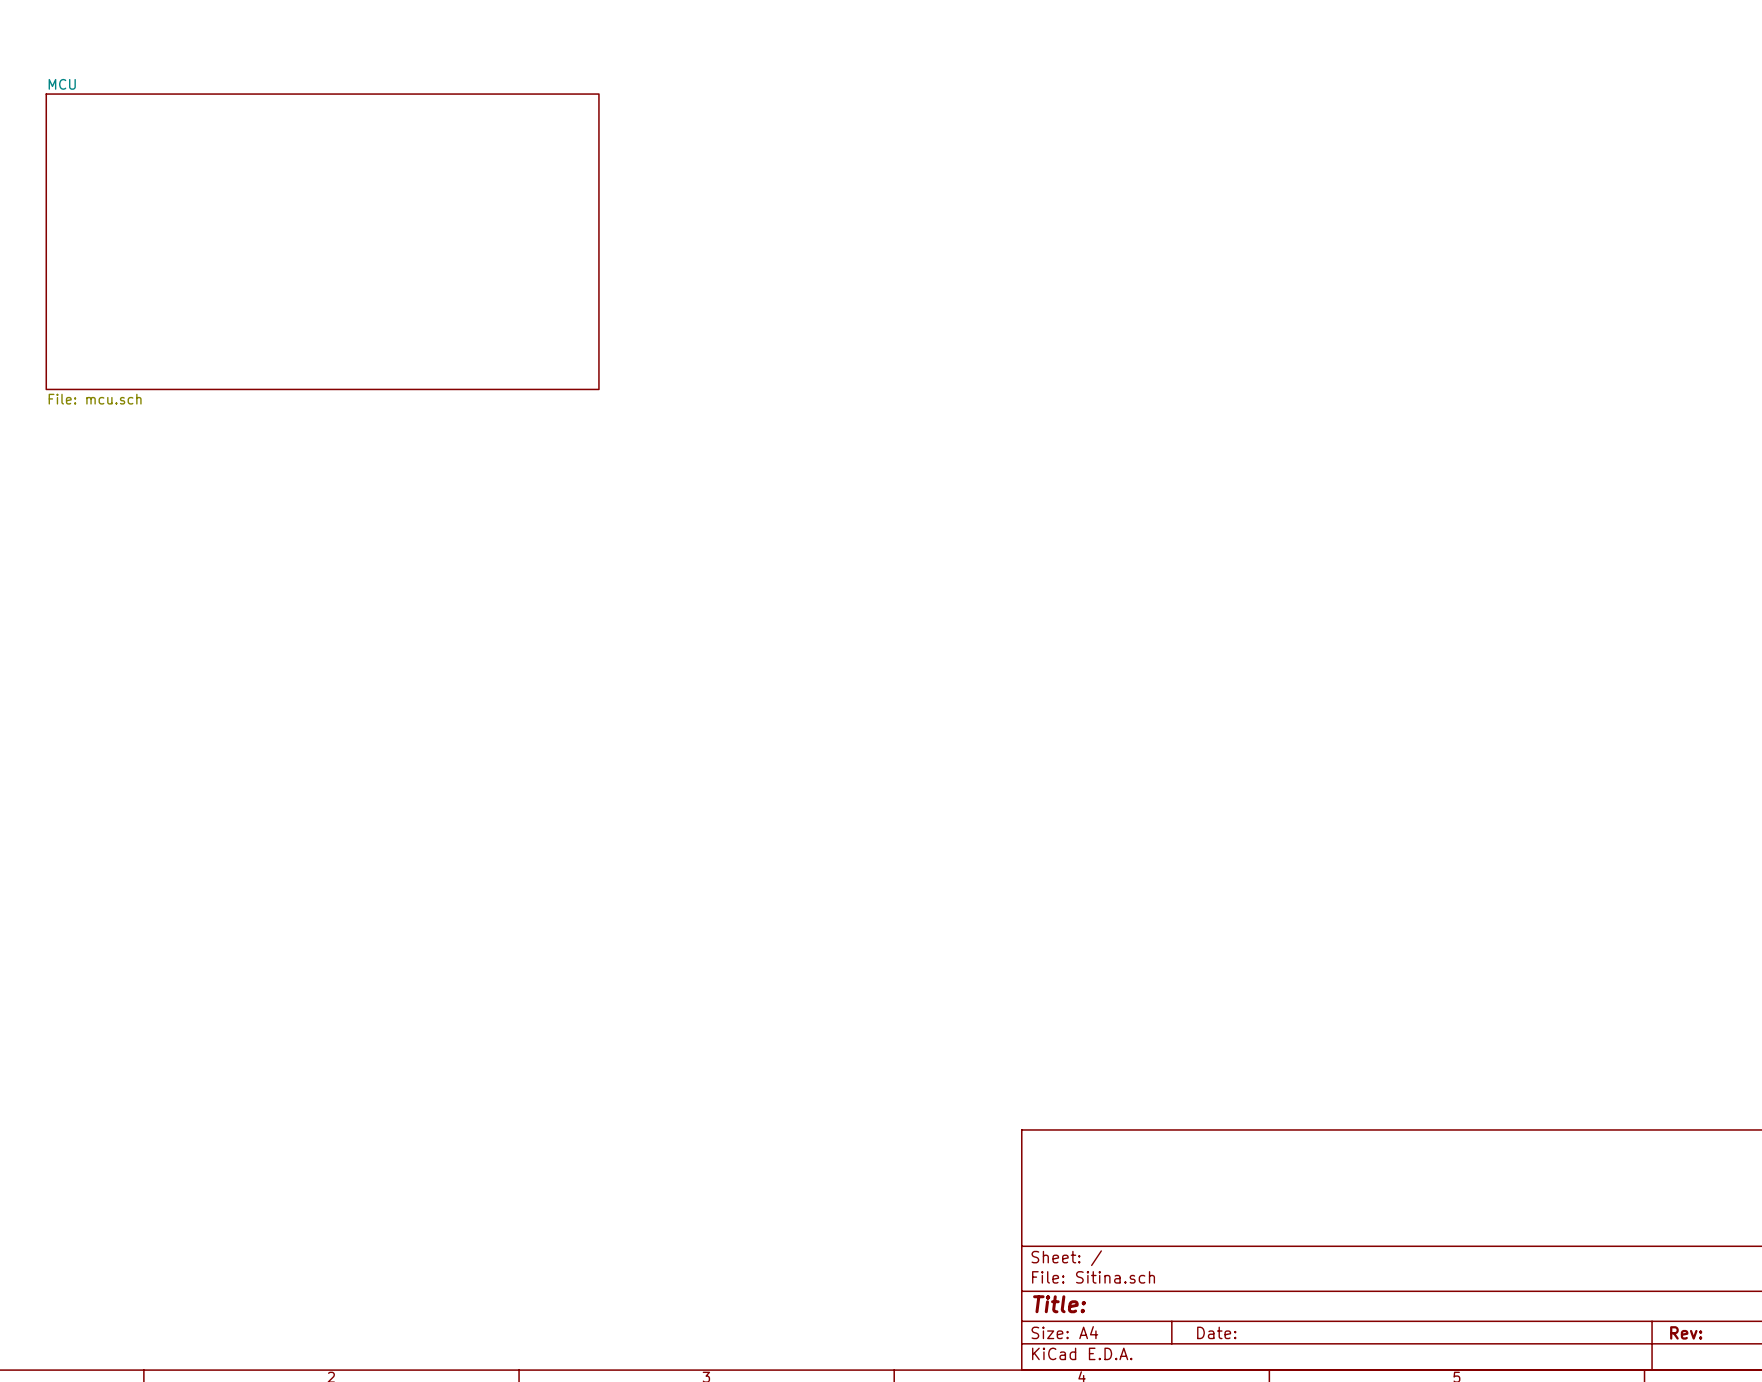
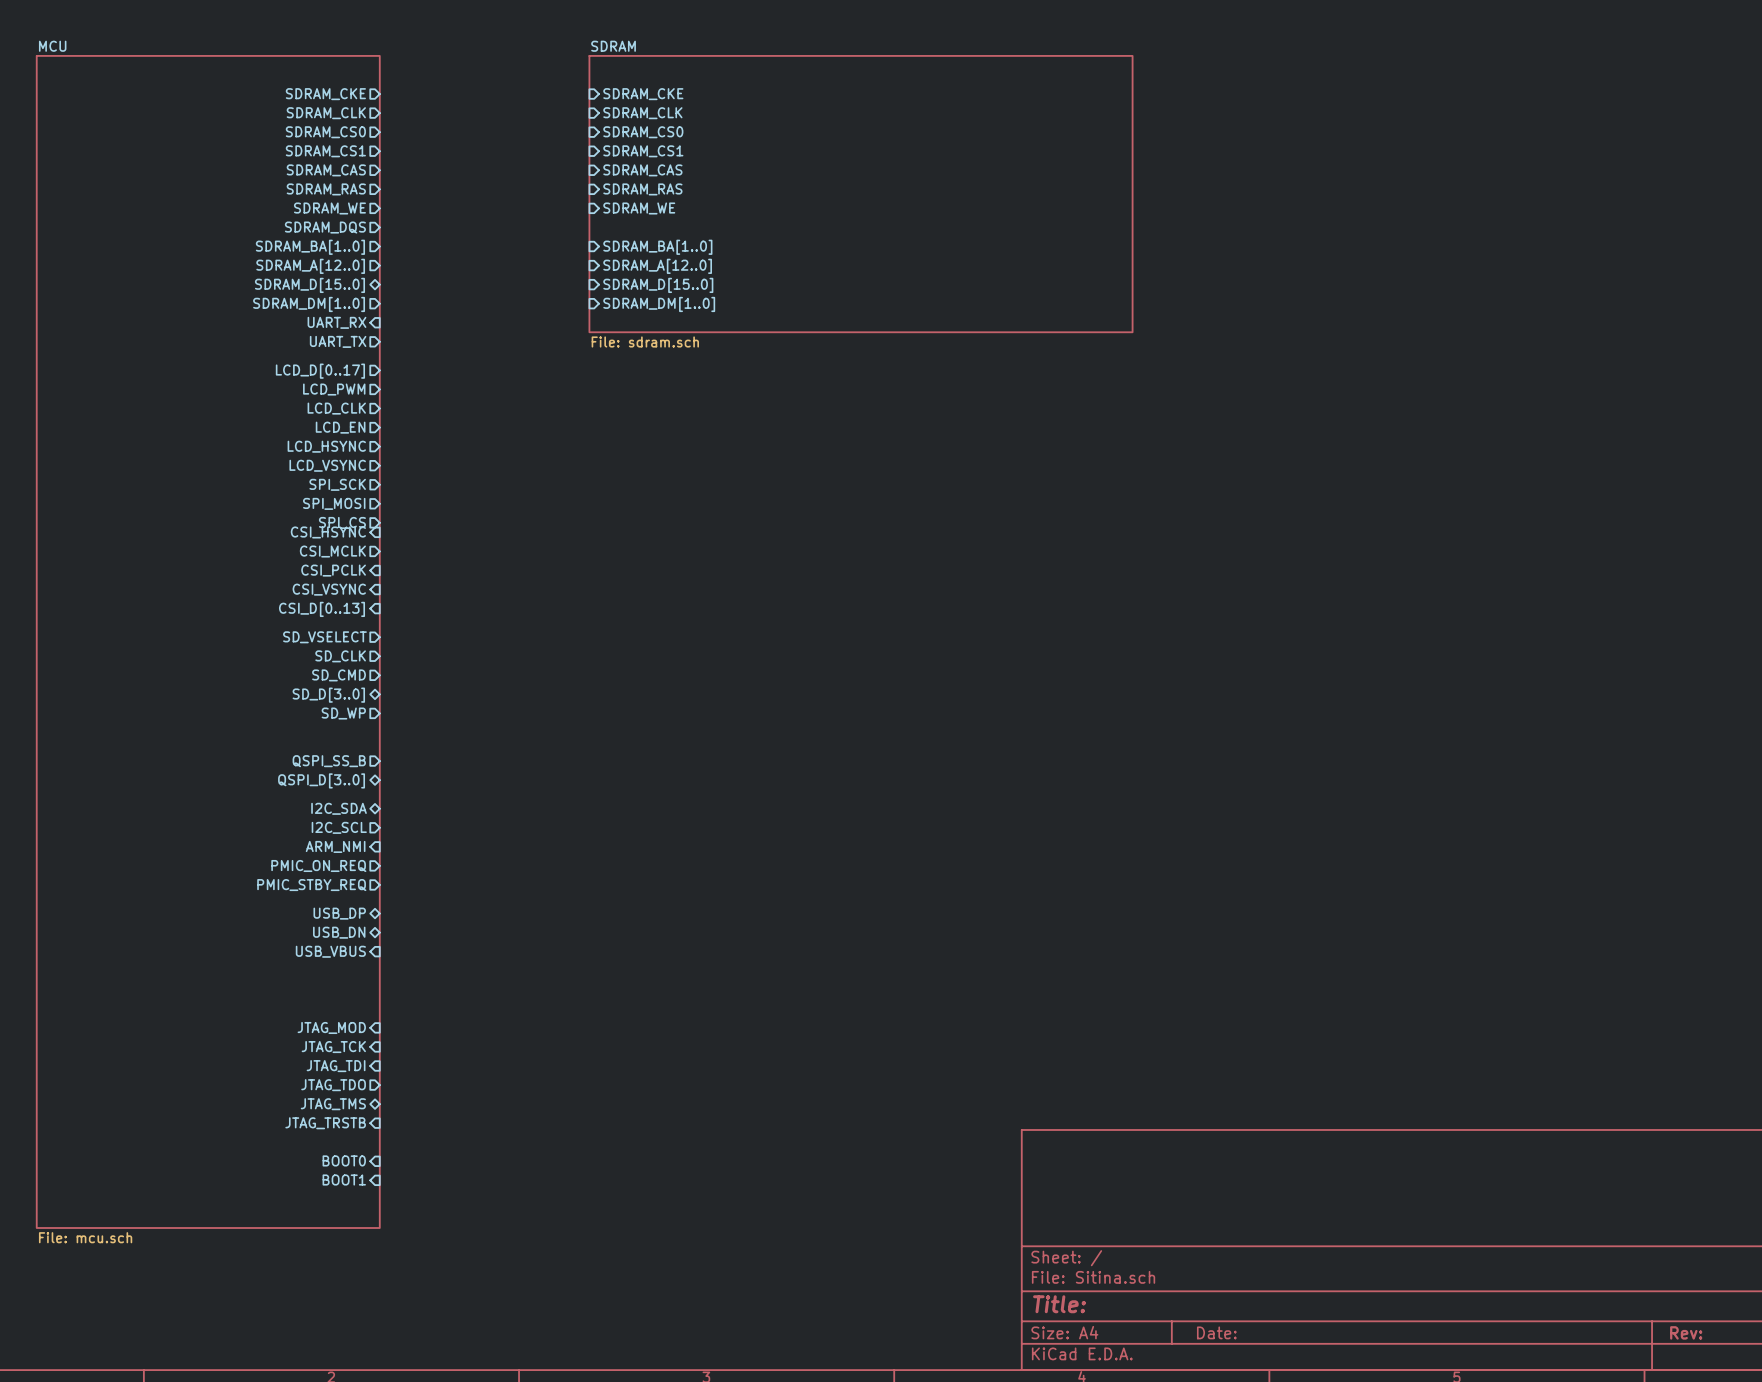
sheet pin: none -> SDRAM_CKE (325, 94)
sheet pin: none -> SDRAM_CKE (643, 94)
sheet pin: none -> SDRAM_CLK (326, 113)
sheet pin: none -> SDRAM_CLK (642, 113)
sheet pin: none -> SDRAM_CS0 (325, 132)
sheet pin: none -> SDRAM_CS0 (643, 132)
sheet pin: none -> SDRAM_CS1 (325, 151)
sheet pin: none -> SDRAM_CS1 (643, 151)
sheet pin: none -> SDRAM_CAS (326, 170)
sheet pin: none -> SDRAM_CAS (642, 170)
sheet pin: none -> SDRAM_RAS (326, 189)
sheet pin: none -> SDRAM_RAS (642, 189)
sheet SDRAM: none -> File: sdram.sch (861, 194)
sheet pin: none -> SDRAM_WE (329, 208)
sheet pin: none -> SDRAM_WE (639, 208)
sheet pin: none -> SDRAM_DQS (325, 227)
sheet MCU: File: mcu.sch (322, 241) -> none
sheet pin: none -> SDRAM_BA[1..0] (310, 247)
sheet pin: none -> SDRAM_BA[1..0] (657, 247)
sheet pin: none -> SDRAM_A[12..0] (310, 266)
sheet pin: none -> SDRAM_A[12..0] (657, 266)
sheet pin: none -> SDRAM_D[15..0] (309, 285)
sheet pin: none -> SDRAM_D[15..0] (658, 285)
sheet pin: none -> SDRAM_DM[1..0] (309, 304)
sheet pin: none -> SDRAM_DM[1..0] (659, 304)
sheet pin: none -> UART_RX (336, 322)
sheet pin: none -> UART_TX (338, 341)
sheet pin: none -> LCD_D[0..17] (320, 371)
sheet pin: none -> LCD_PWM (334, 389)
sheet pin: none -> LCD_CLK (336, 408)
sheet pin: none -> LCD_EN (340, 427)
sheet pin: none -> LCD_HSYNC (326, 446)
sheet pin: none -> LCD_VSYNC (327, 465)
sheet pin: none -> SPI_SCK (337, 484)
sheet pin: none -> SPI_MOSI (334, 503)
sheet pin: none -> SPI_CS (342, 522)
sheet pin: none -> CSI_HSYNC (328, 532)
sheet pin: none -> CSI_MCLK (332, 551)
sheet pin: none -> CSI_PCLK (333, 570)
sheet pin: none -> CSI_VSYNC (329, 589)
sheet pin: none -> CSI_D[0..13] (322, 609)
sheet pin: none -> SD_VSELECT (324, 637)
sheet MCU: none -> File: mcu.sch (208, 641)
sheet pin: none -> SD_CLK (340, 656)
sheet pin: none -> SD_CMD (339, 675)
sheet pin: none -> SD_D[3..0] (328, 695)
sheet pin: none -> SD_WP (343, 713)
sheet pin: none -> QSPI_SS_B (329, 761)
sheet pin: none -> QSPI_D[3..0] (321, 780)
sheet pin: none -> I2C_SDA (339, 808)
sheet pin: none -> I2C_SCL (339, 827)
sheet pin: none -> ARM_NMI (335, 846)
sheet pin: none -> PMIC_ON_REQ (318, 865)
sheet pin: none -> PMIC_STBY_REQ (311, 885)
sheet pin: none -> USB_DP (339, 913)
sheet pin: none -> USB_DN (339, 932)
sheet pin: none -> USB_VBUS (330, 951)
sheet pin: none -> JTAG_MOD (331, 1027)
sheet pin: none -> JTAG_TCK (333, 1047)
sheet pin: none -> JTAG_TDI (336, 1066)
sheet pin: none -> JTAG_TDO (333, 1085)
sheet pin: none -> JTAG_TMS (333, 1104)
sheet pin: none -> JTAG_TRSTB (325, 1123)
sheet pin: none -> BOOT0 (344, 1160)
sheet pin: none -> BOOT1 (344, 1180)

